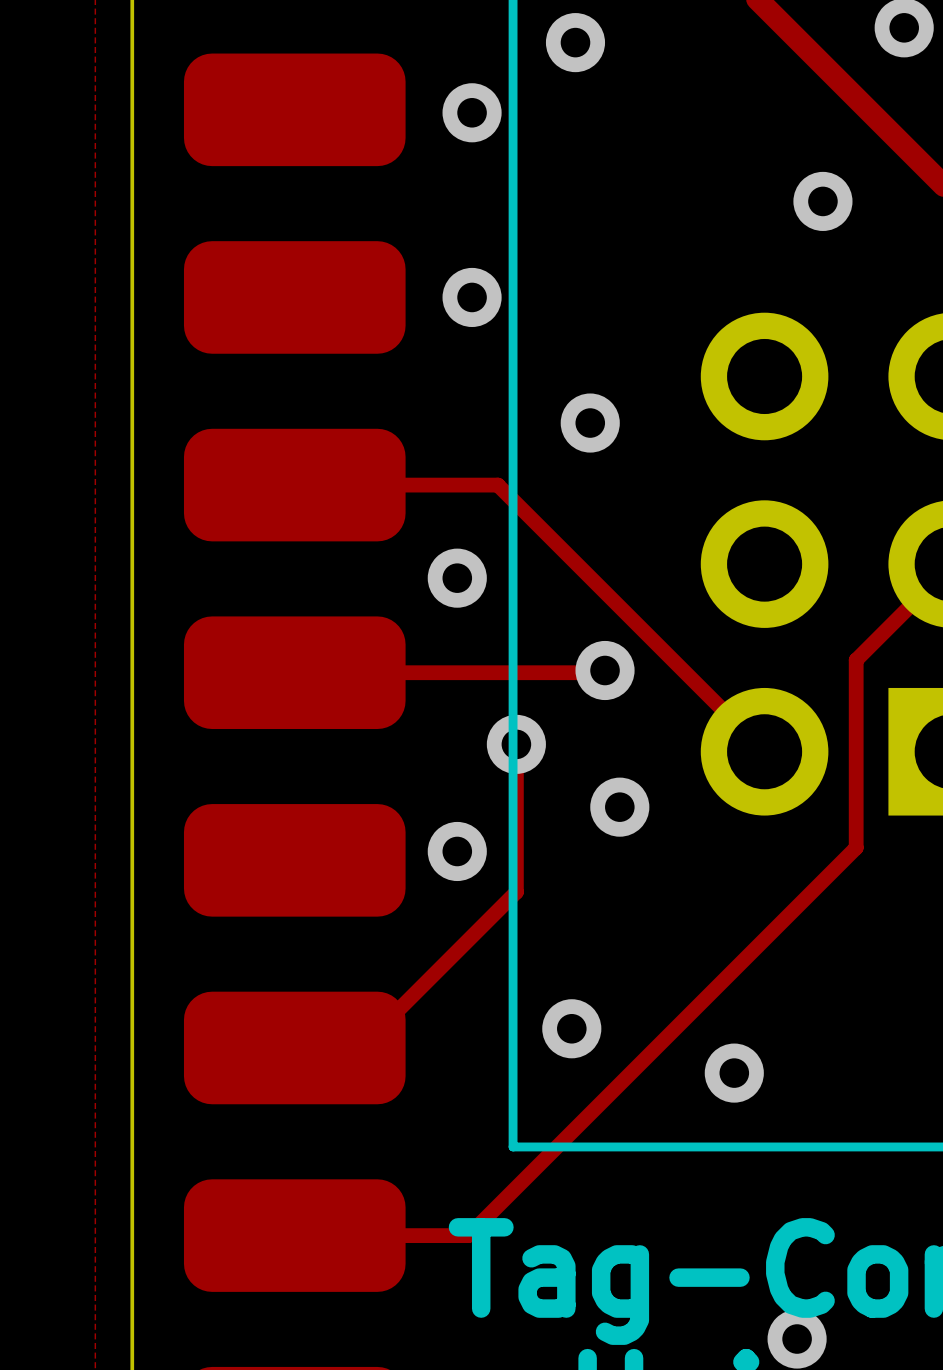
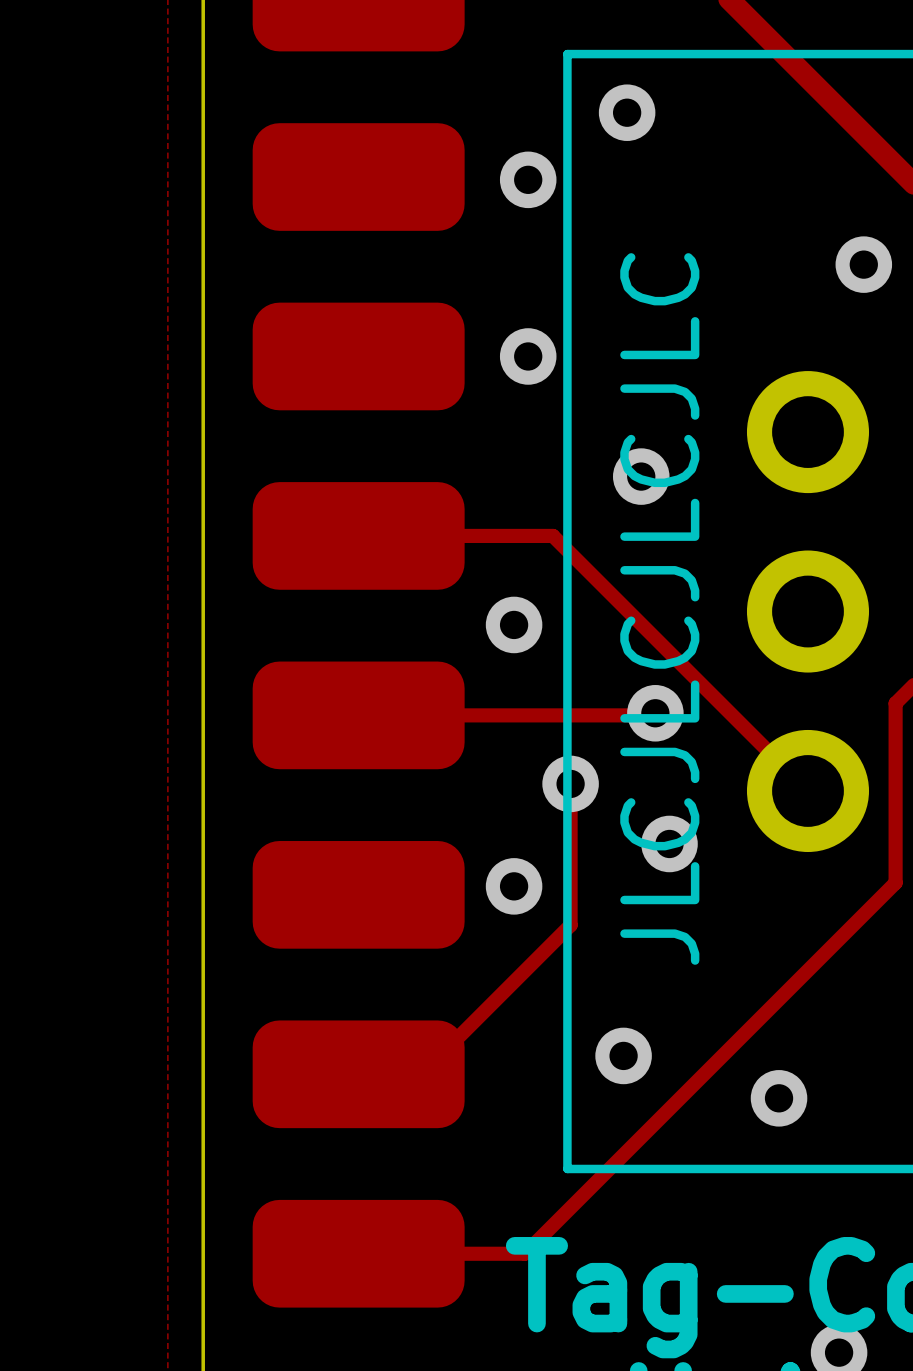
text: none -> JLCJLCJLCJLC (659, 608)

